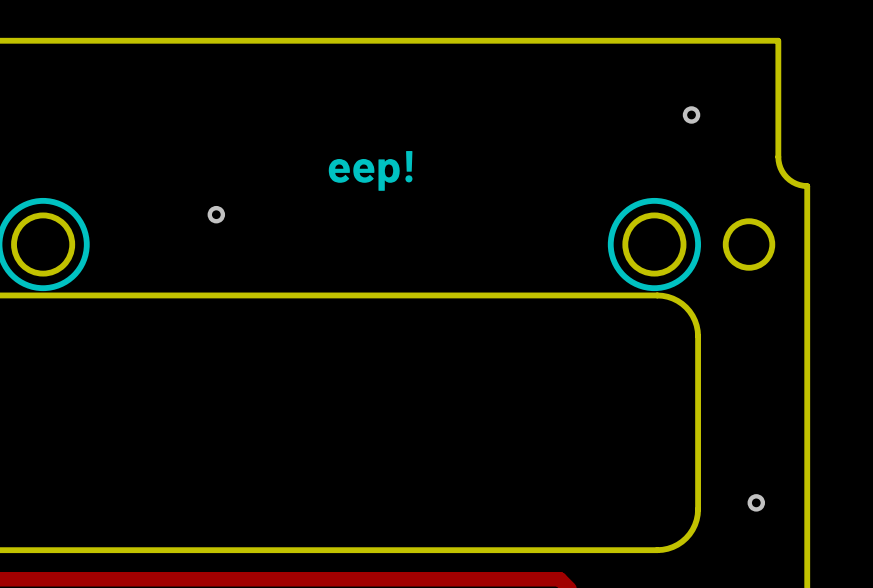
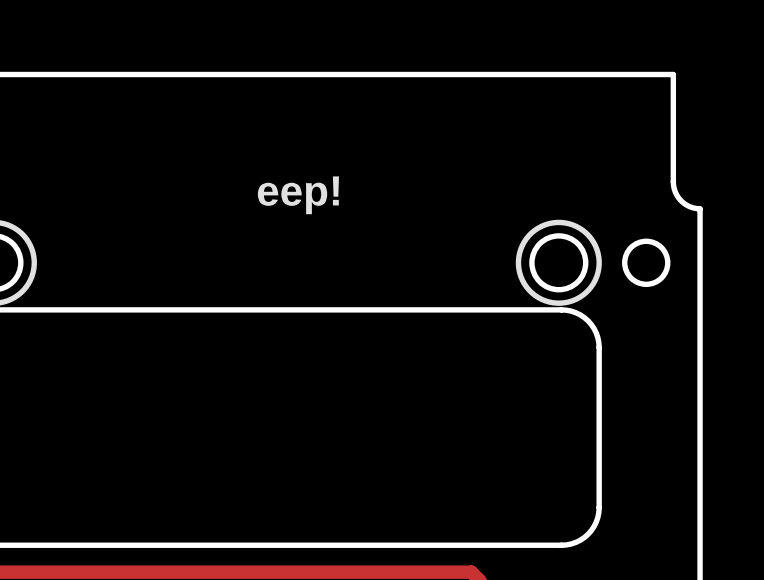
via: (691, 114) -> none
via: (216, 214) -> none
via: (756, 502) -> none

